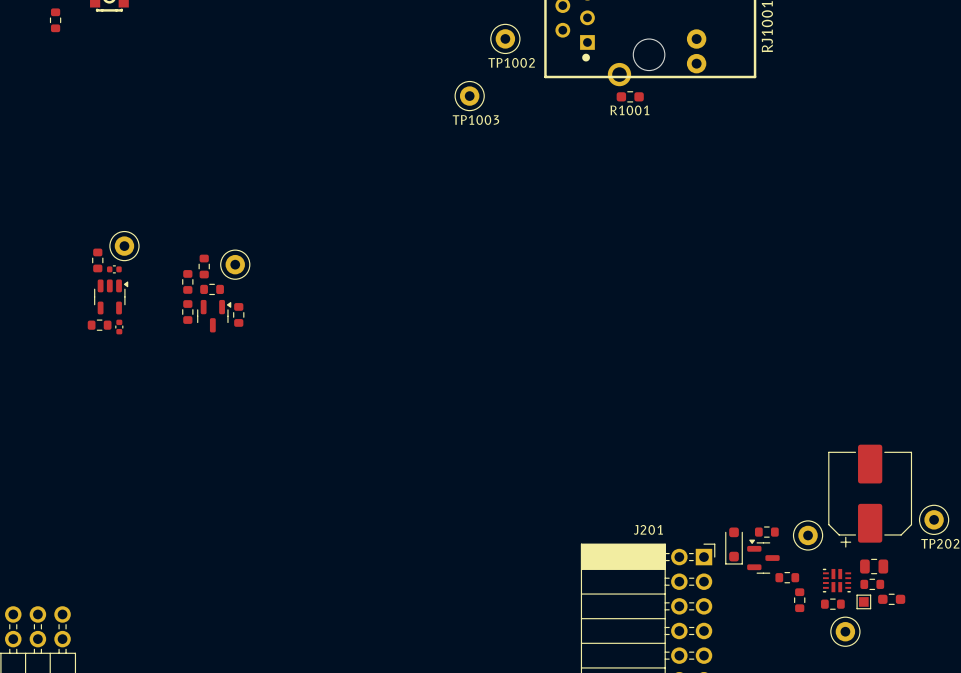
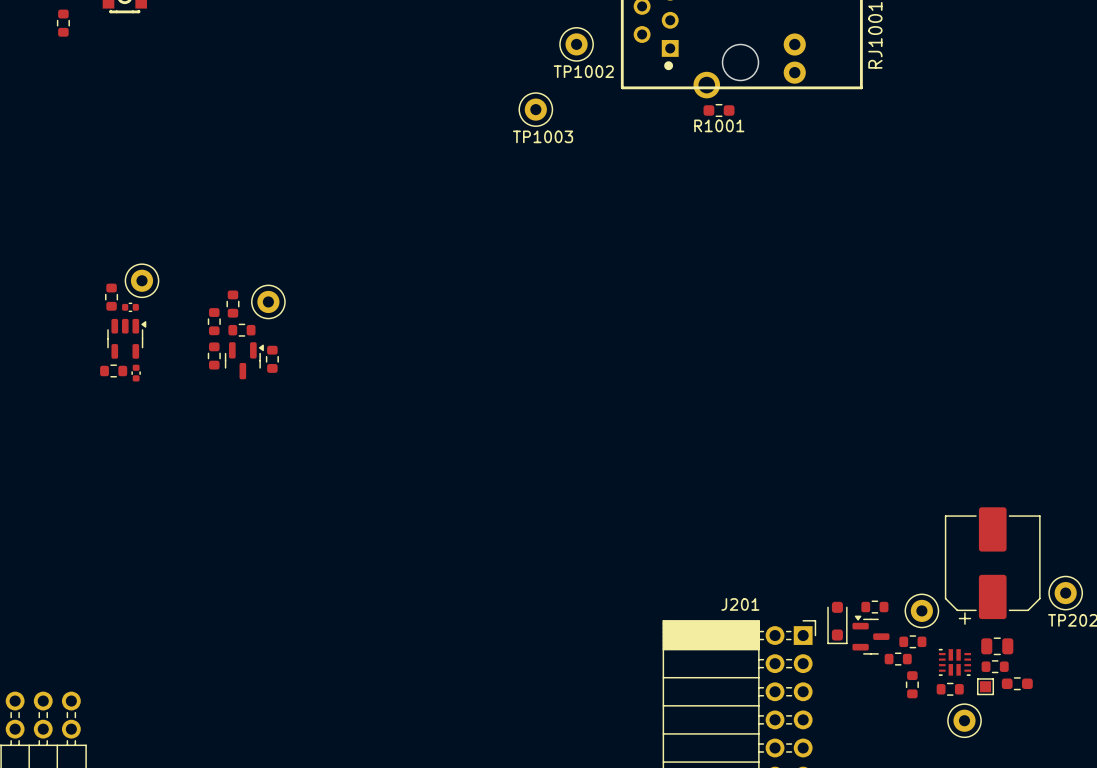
part: none -> (912, 641)

